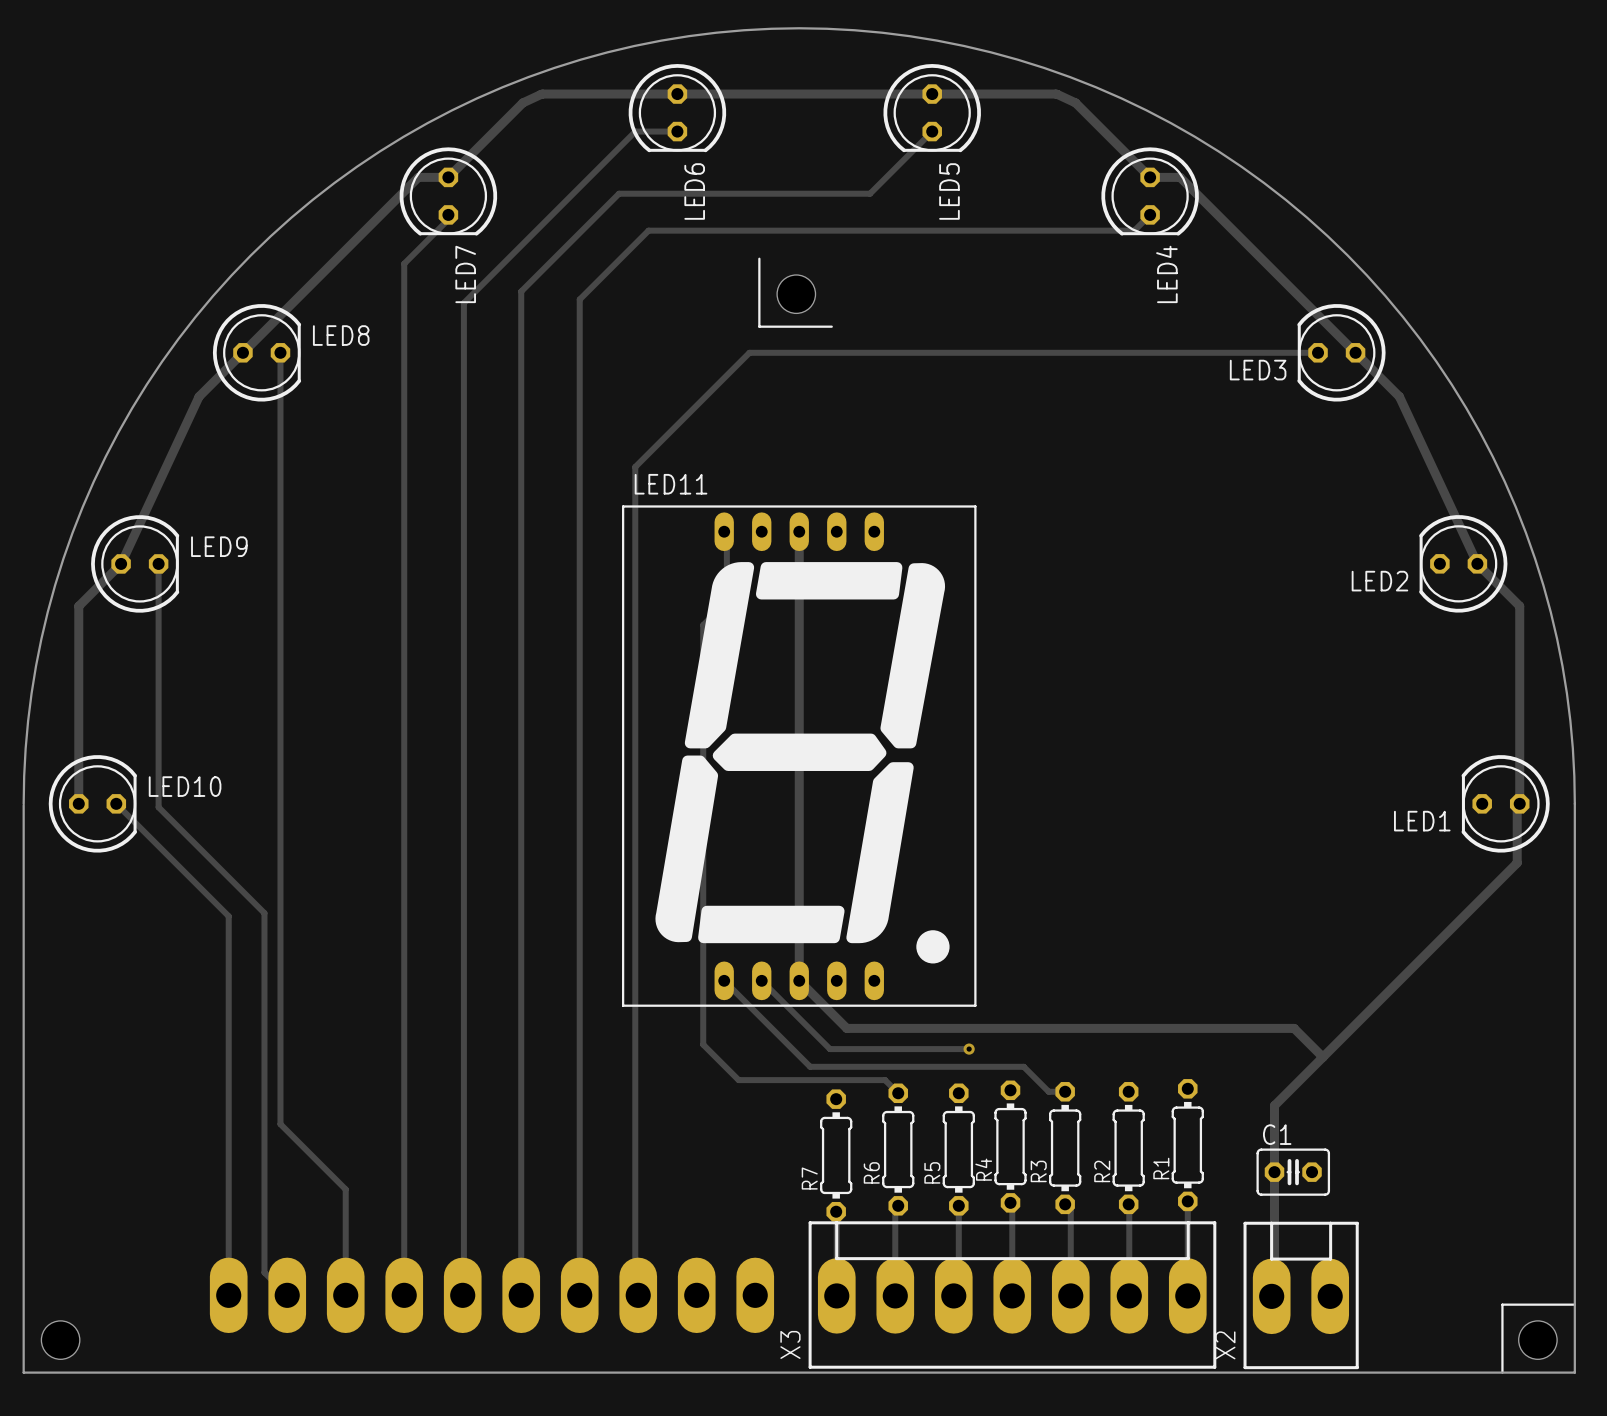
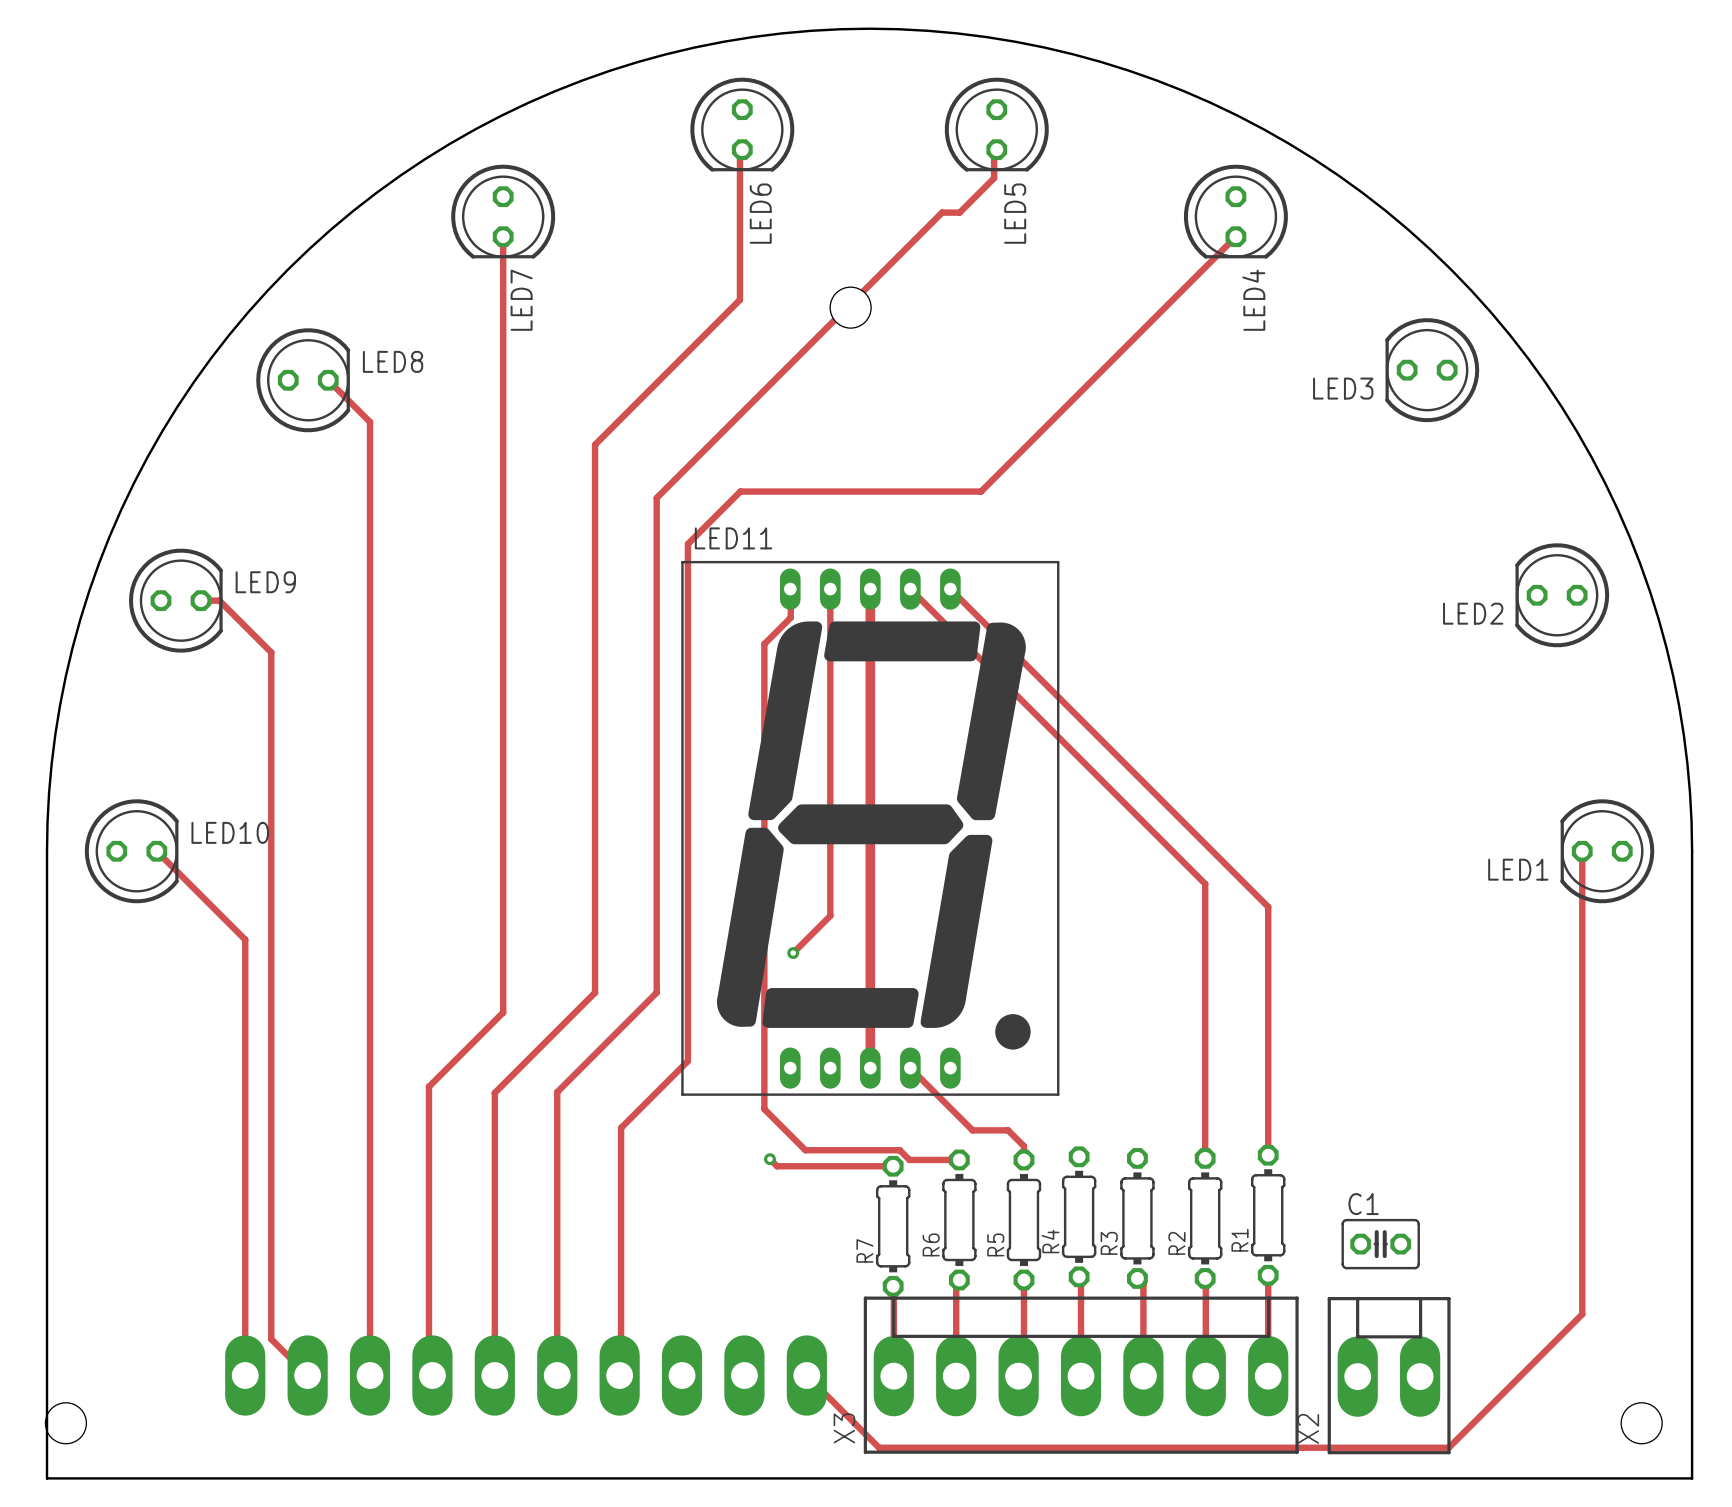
LED6 position: (677, 108) -> (742, 124)
LED5 position: (932, 108) -> (996, 124)
track: (677, 131) (635, 131) (463, 303) (462, 1295) -> (742, 149) (739, 152) (739, 299) (595, 444) (595, 992) (494, 1092) (494, 1375)
track: (932, 131) (870, 193) (619, 193) (521, 291) (521, 1029) -> (996, 149) (994, 152) (994, 178) (959, 212) (942, 212) (656, 497) (656, 992) (557, 1092)
LED7 position: (448, 191) -> (503, 211)
LED4 position: (1150, 191) -> (1235, 211)
track: (448, 214) (448, 219) (404, 263) (404, 1295) -> (503, 236) (503, 1012) (428, 1086) (428, 1372) (432, 1375)
track: (1150, 214) (1134, 230) (648, 230) (579, 299) (579, 1295) -> (1235, 236) (981, 491) (740, 491) (687, 544) (687, 1061) (621, 1127) (619, 1375)
line: (759, 258) (759, 326) (831, 326) -> none
LED8 position: (257, 352) -> (303, 380)
track: (280, 352) (280, 1124) (345, 1189) -> (328, 380) (370, 422) (370, 1262)
track: (1318, 352) (749, 352) (635, 467) (635, 1292) (638, 1295) -> none
track: (724, 531) (726, 534) (726, 601) (703, 625) (703, 1044) (738, 1080) (885, 1080) (898, 1093) -> (790, 589) (790, 617) (764, 644) (764, 1109) (805, 1150) (899, 1150) (909, 1159) (959, 1159)
track: (799, 531) (799, 980) (846, 1028) (1294, 1028) (1322, 1057) -> none
track: none -> (830, 589) (830, 915) (793, 953)
track: none -> (870, 589) (870, 1068)
track: none -> (910, 589) (1205, 883) (1205, 1158)
track: none -> (950, 589) (1268, 906) (1268, 1155)
LED9 position: (135, 563) -> (176, 600)
track: (158, 563) (158, 807) (264, 913) (264, 1272) -> (201, 600) (219, 600) (271, 652) (271, 1339) (283, 1351)
LED11 position: (799, 756) -> (870, 828)
board edge: (23, 803) (28, 720) (36, 666) (47, 612) (72, 532) (105, 456) (132, 408) (162, 361) (213, 295) (250, 255) (291, 217) (356, 166) (427, 123) (477, 98) (528, 77) (580, 59) (634, 45) (716, 32) (799, 28) (882, 32) (964, 45) (1017, 59) (1070, 77) (1146, 110) (1218, 151) (1285, 199) (1347, 255) (1403, 317) (1451, 384) (1492, 456) (1525, 532) (1543, 585) (1557, 638) (1566, 693) (1572, 748) (1574, 803) (1574, 1372) (23, 1372) (23, 805) -> none
board edge: none -> (47, 851) (47, 1478) (1692, 1478) (1692, 851) (1690, 792) (1683, 734) (1673, 676) (1658, 619) (1640, 563) (1605, 483) (1561, 406) (1510, 335) (1451, 269) (1385, 210) (1314, 159) (1237, 115) (1157, 80) (1101, 62) (1044, 47) (957, 33) (869, 28) (810, 30) (752, 37) (666, 54) (582, 80) (501, 115) (449, 143) (400, 175) (353, 210) (309, 249) (247, 312) (193, 382) (162, 431) (134, 483) (98, 563) (80, 619) (65, 676) (51, 763) (47, 851)
track: (78, 803) (78, 606) (121, 563) (199, 396) (418, 177) (448, 177) (522, 102) (542, 94) (1057, 94) (1075, 102) (1150, 177) (1180, 177) (1399, 396) (1477, 563) (1519, 606) (1519, 803) (1517, 806) (1517, 862) (1274, 1105) (1274, 1296) (1271, 1296) -> none
LED10 position: (92, 803) -> (131, 851)
track: (116, 803) (228, 916) -> (156, 851) (245, 939) (245, 971)
track: none -> (1582, 851) (1582, 1314) (1448, 1447) (879, 1447) (806, 1375)
via: none -> (793, 953)
track: (724, 980) (810, 1066) (1023, 1066) (1048, 1091) (1065, 1091) -> none
track: (761, 980) (829, 1049) (969, 1049) -> none
track: none -> (910, 1068) (972, 1130) (1008, 1130) (1023, 1146) (1023, 1159)
via: (969, 1049) -> none
track: none -> (769, 1159) (777, 1166) (893, 1166)
via: none -> (769, 1159)
line: (1574, 1304) (1502, 1304) (1502, 1372) -> none

